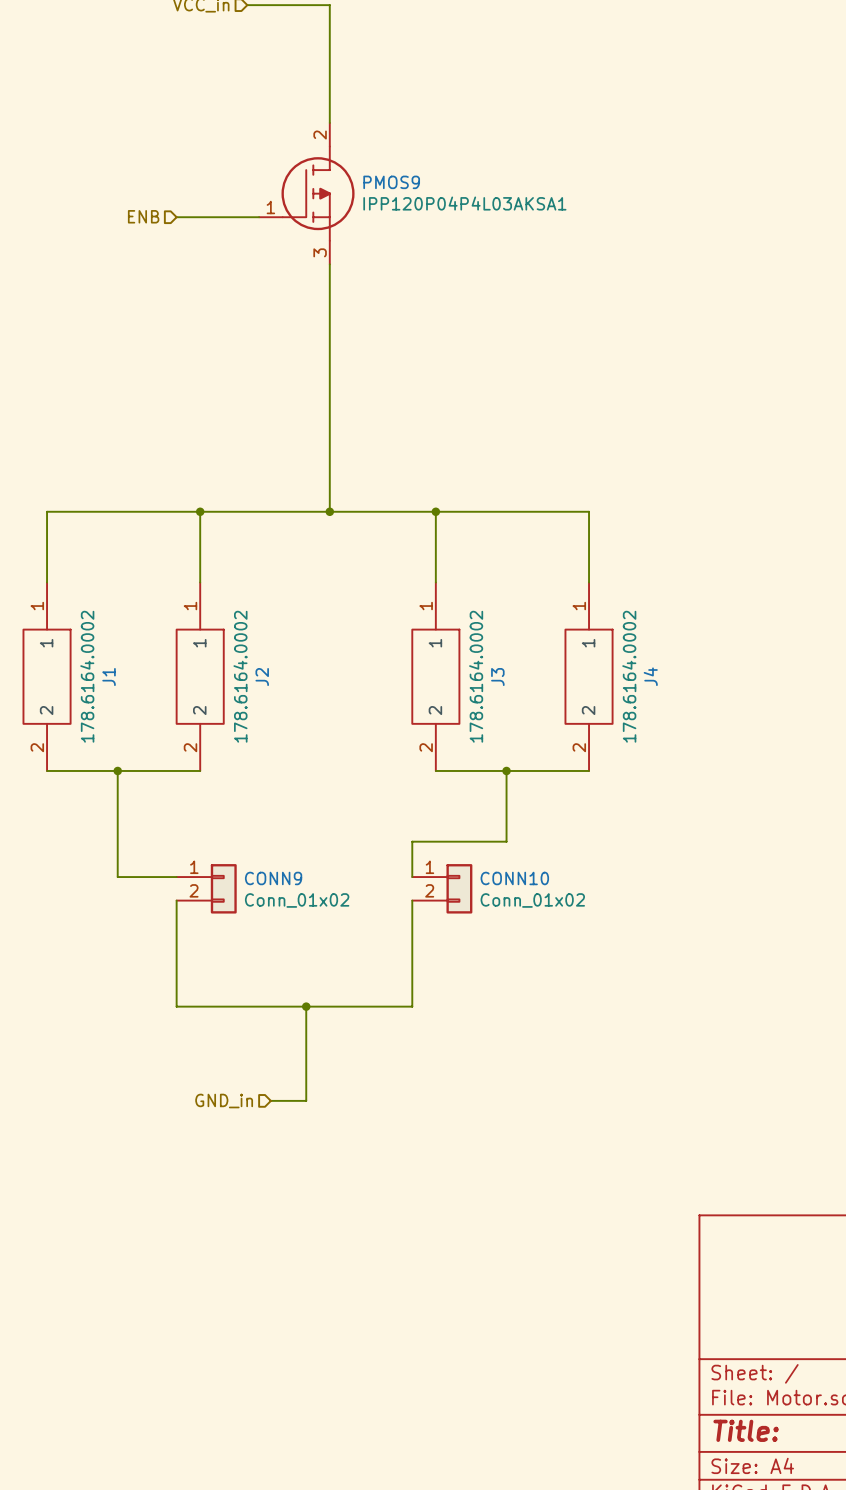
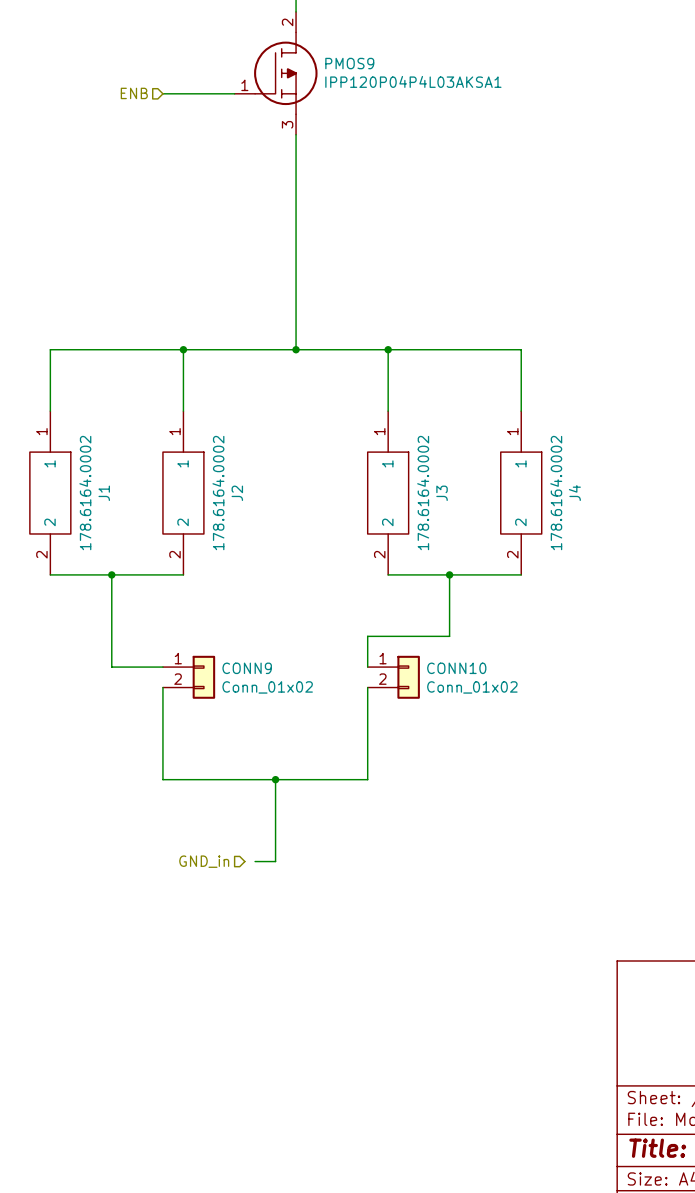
wire: (270, 1100) (282, 1100) -> none

